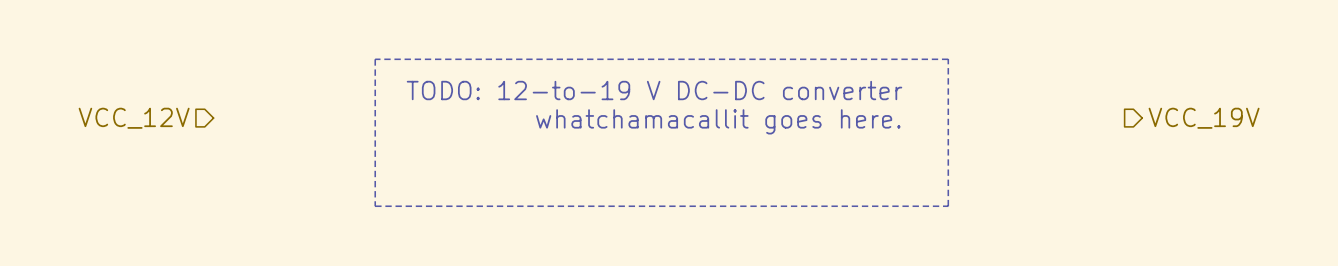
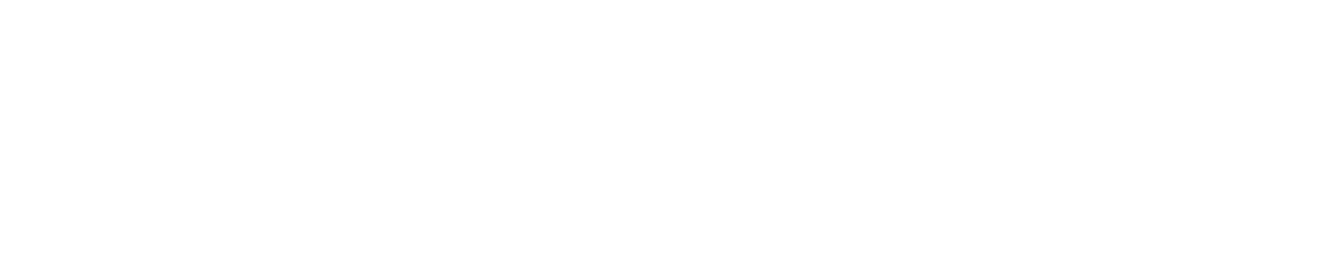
line: (375, 59) (375, 206) (948, 206) (948, 59) (375, 59) -> none
text: TODO: 12-to-19 V DC-DC converter (654, 90) -> none
hierarchical label: VCC_12V (134, 118) -> none
hierarchical label: VCC_19V (1204, 118) -> none
text: whatchamacallit goes here. (718, 121) -> none

